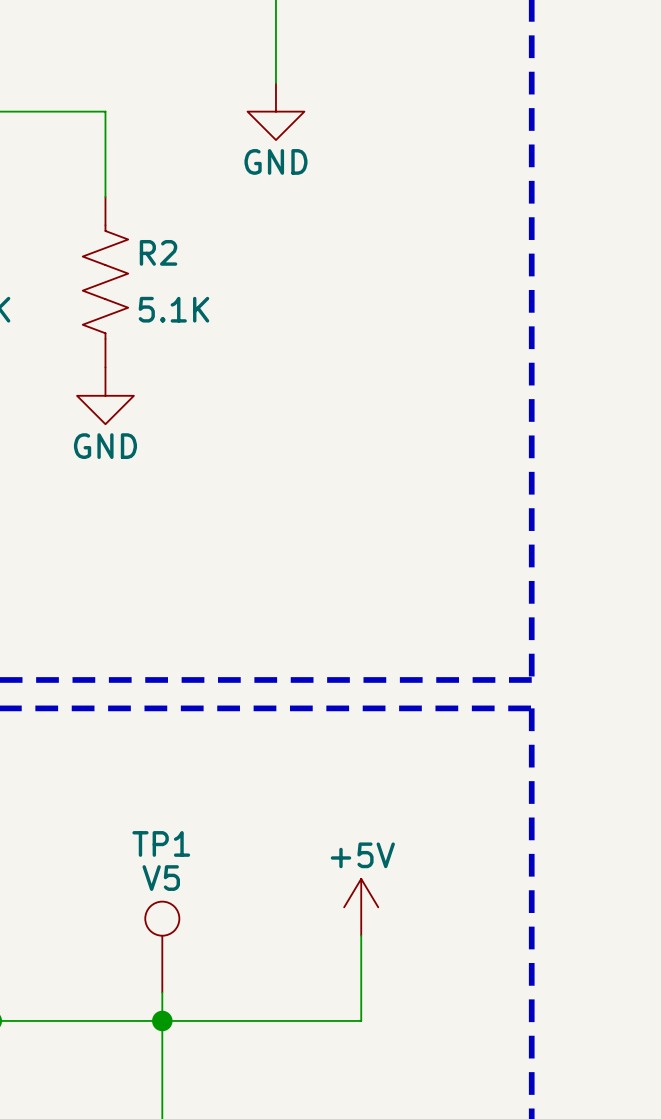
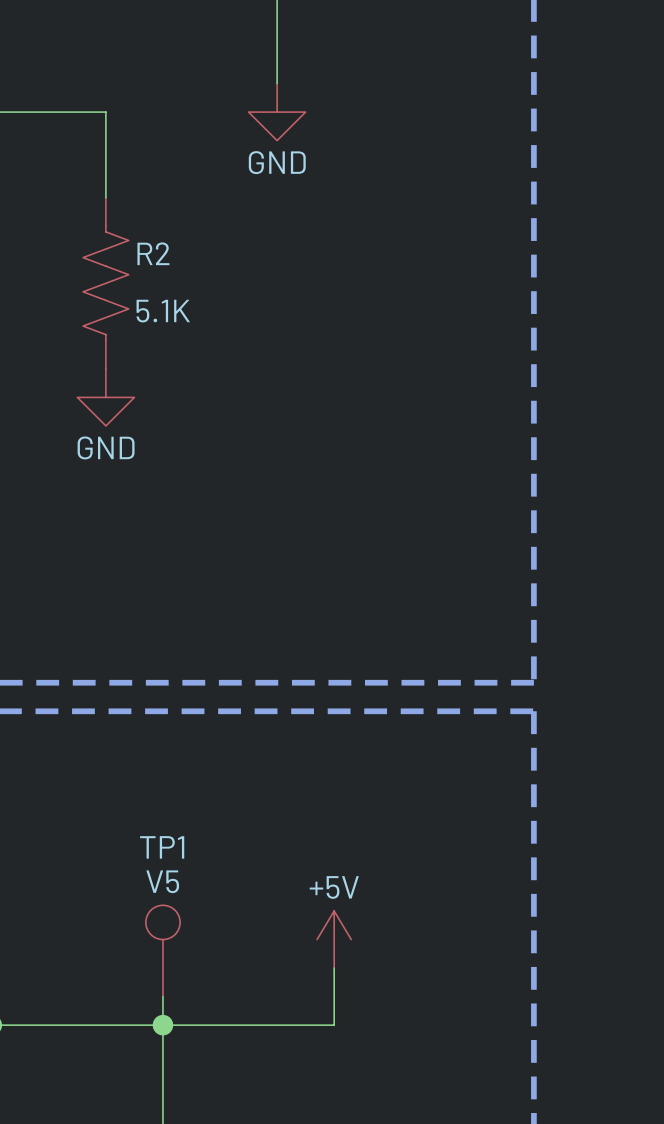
power symbol position: +5V (361, 907) -> +5V (334, 939)
wire: (361, 935) (361, 1020) (332, 1020) -> (334, 968) (334, 1025)

